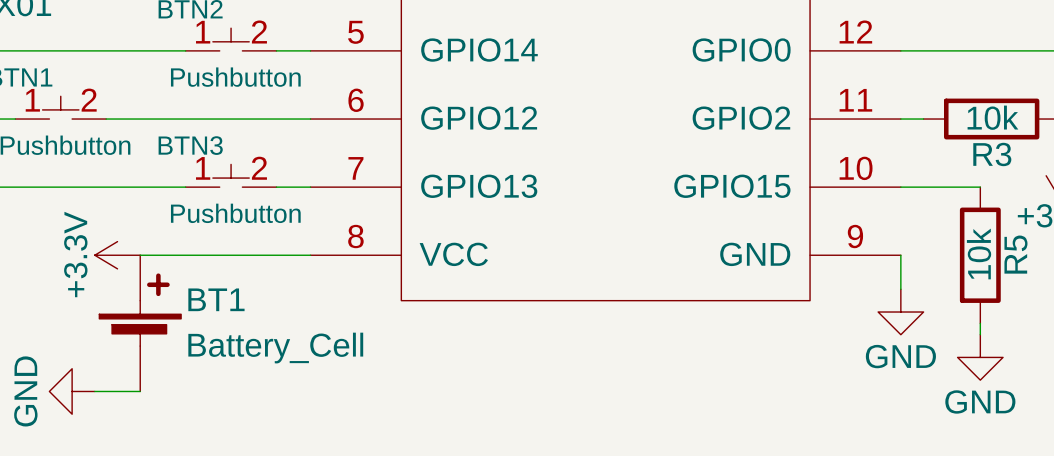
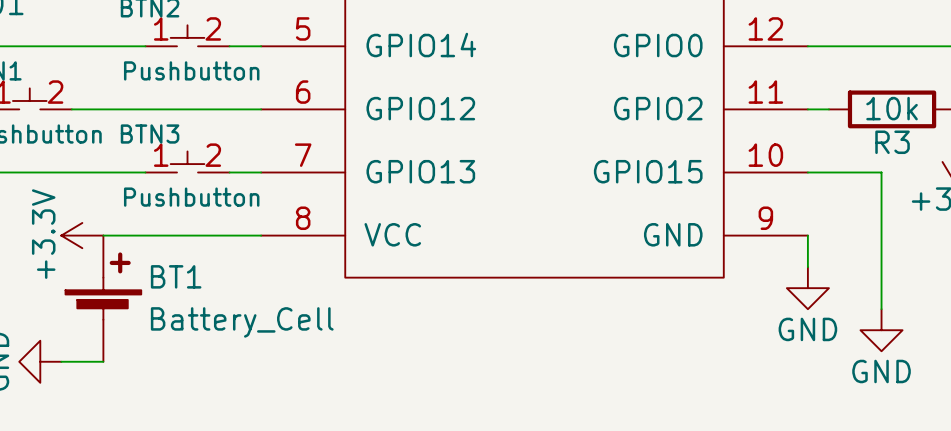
wire: none -> (881, 172) (881, 298)
R5: 10k (980, 255) -> none

